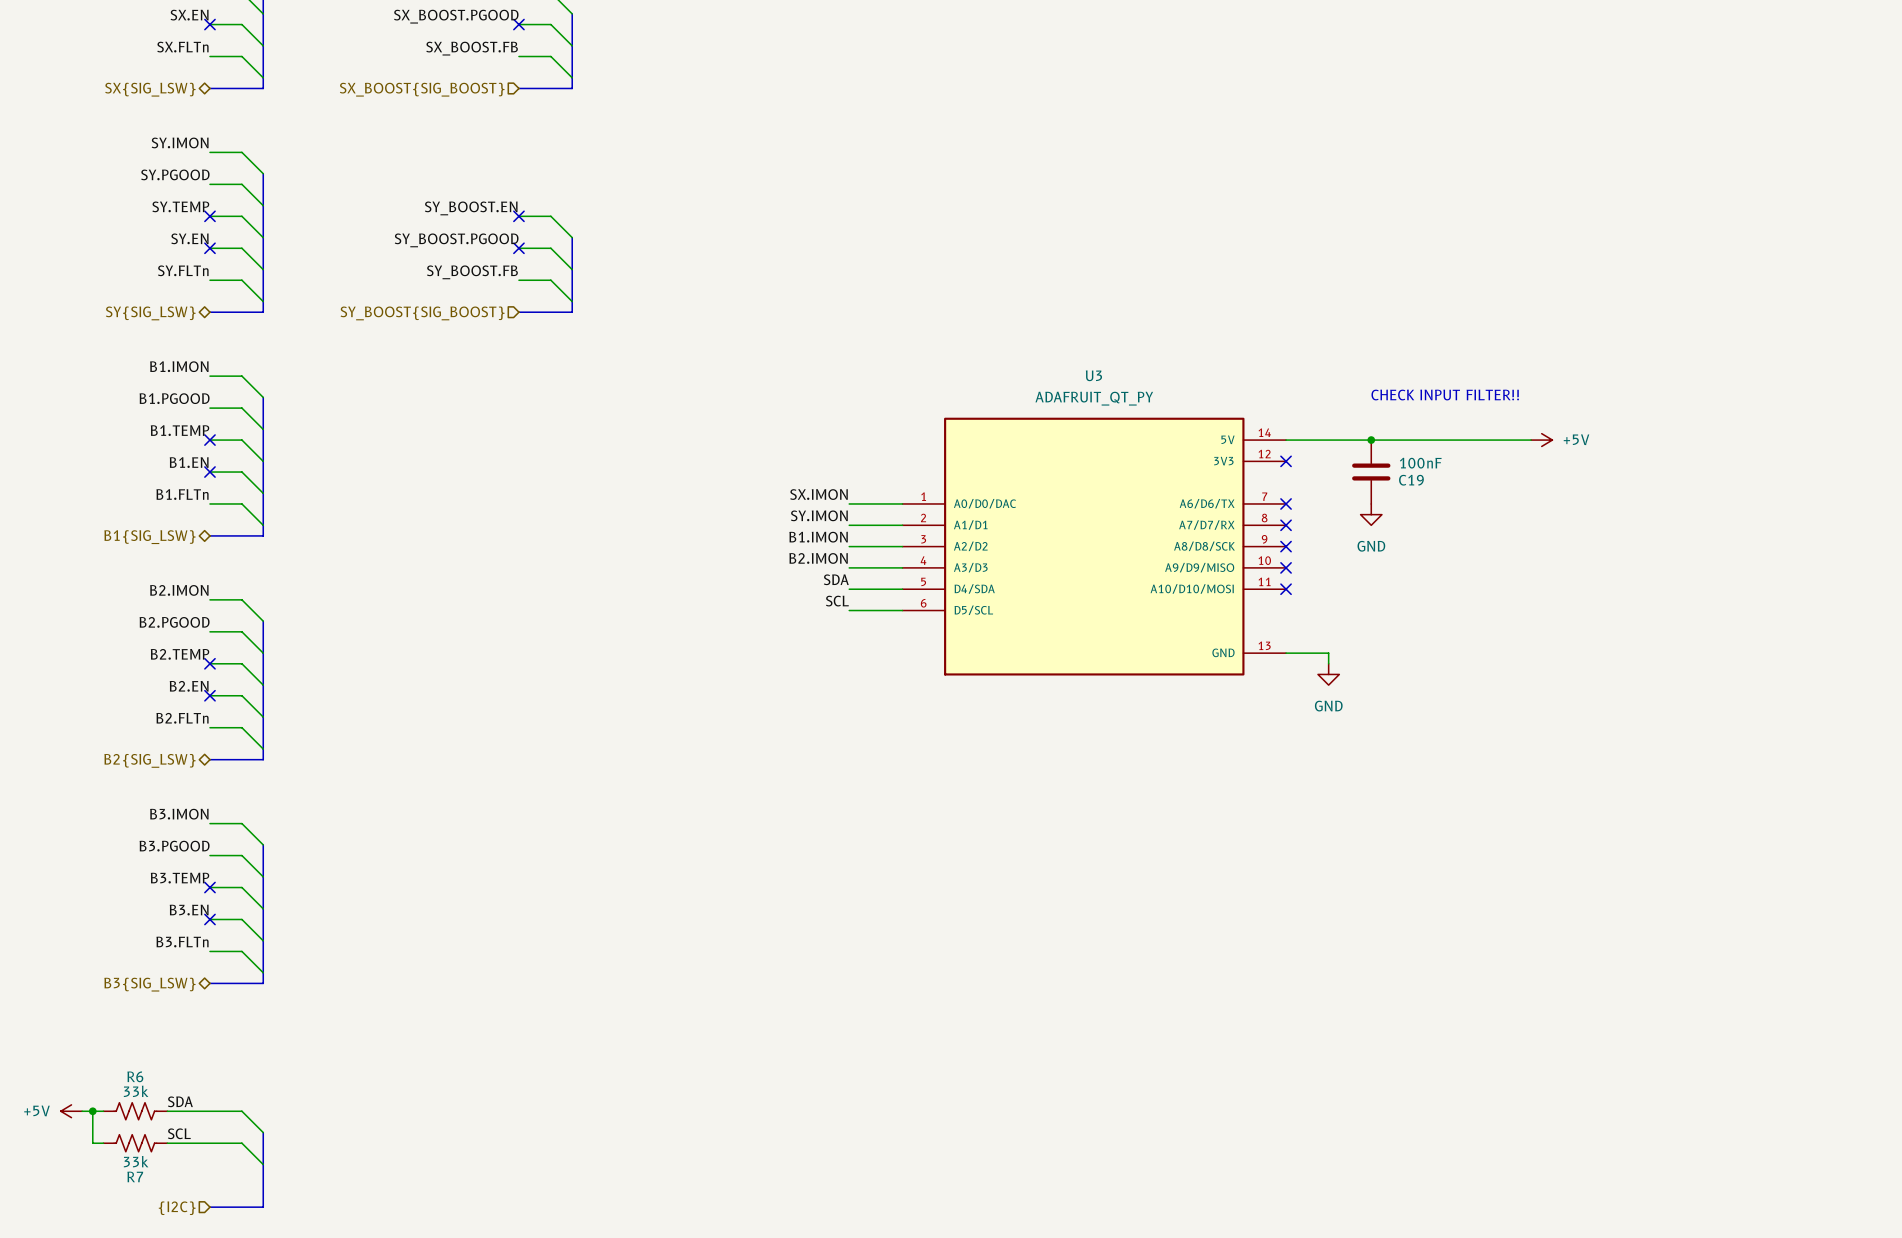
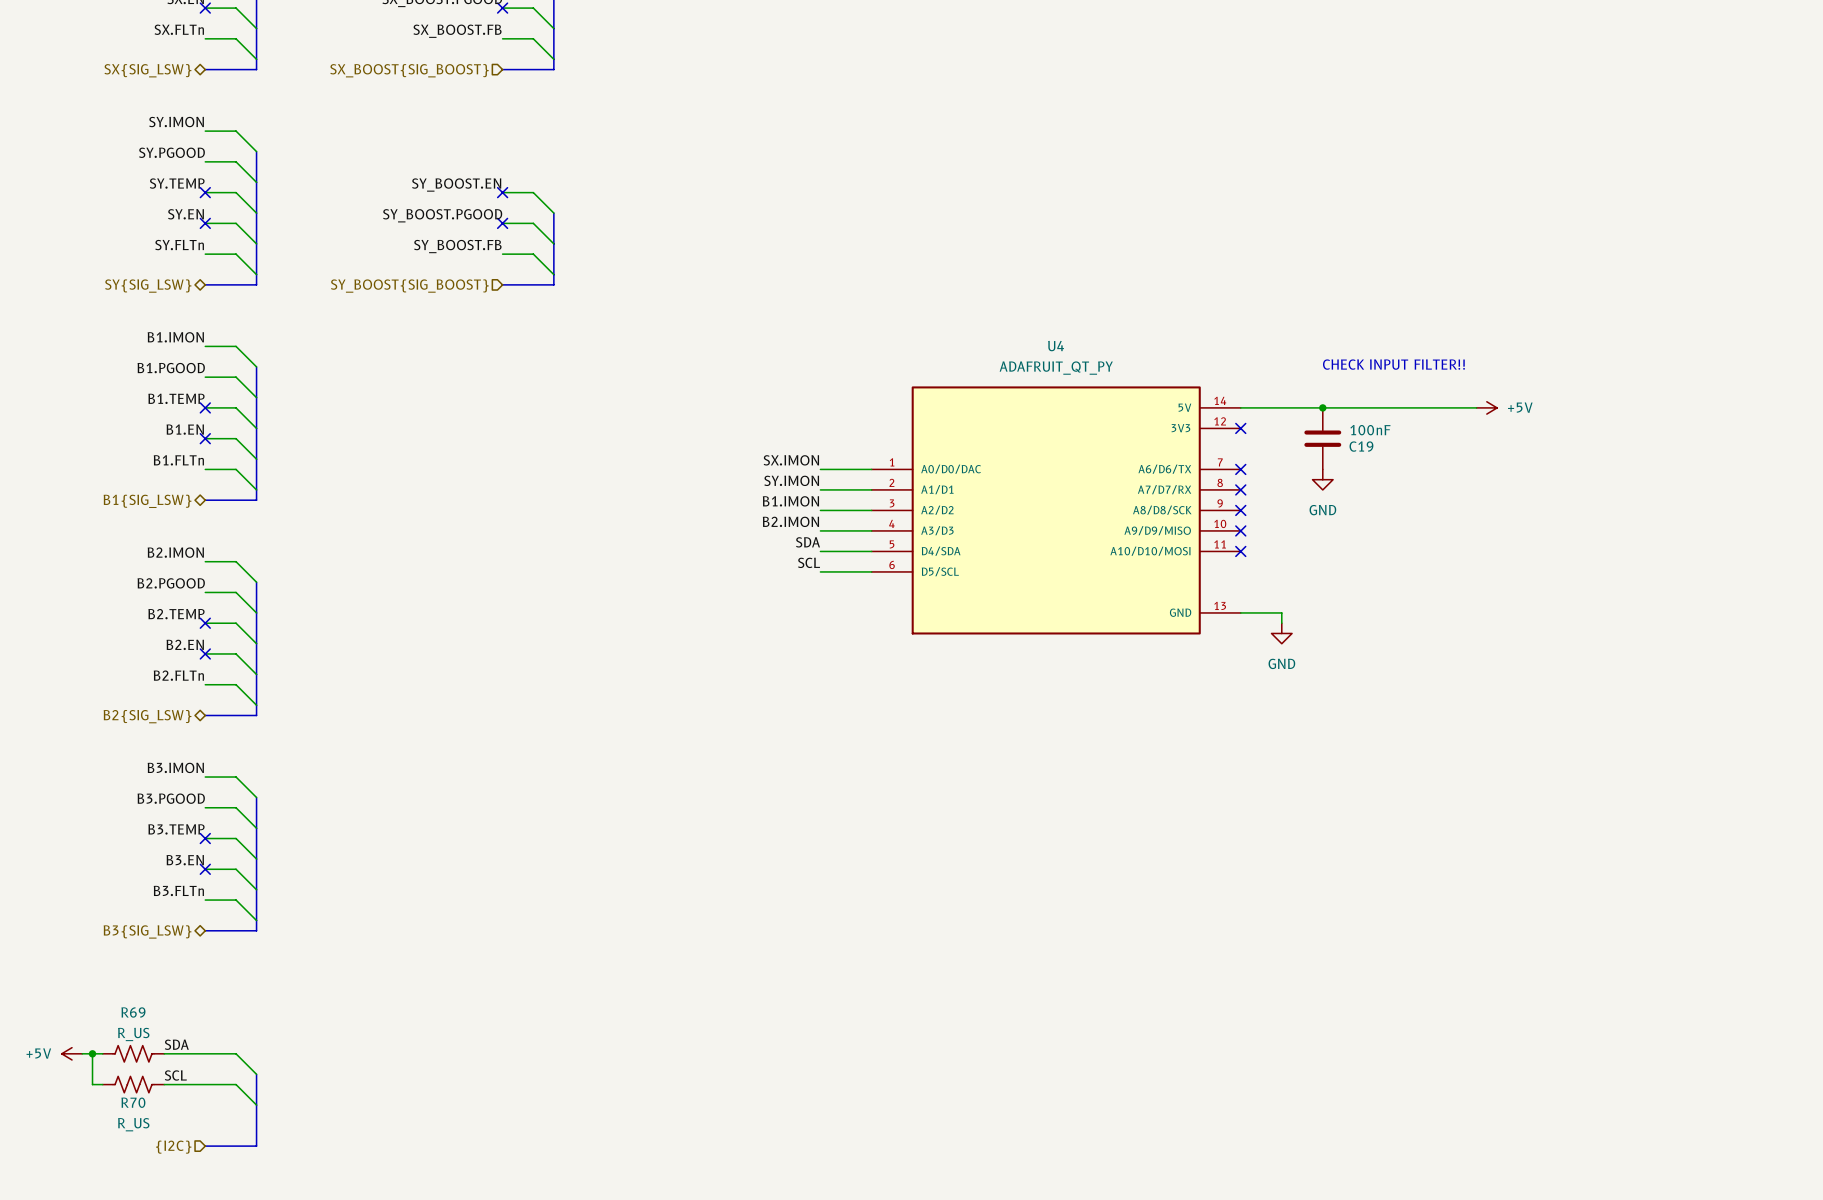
U3 name: U3 (1093, 375) -> U4 (1056, 346)
R6 name: R6 (135, 1076) -> R69 (133, 1012)
R6 value: 33k (136, 1091) -> R_US (133, 1034)
R7 value: 33k (136, 1161) -> R_US (133, 1124)
R7 name: R7 (135, 1176) -> R70 (133, 1102)

